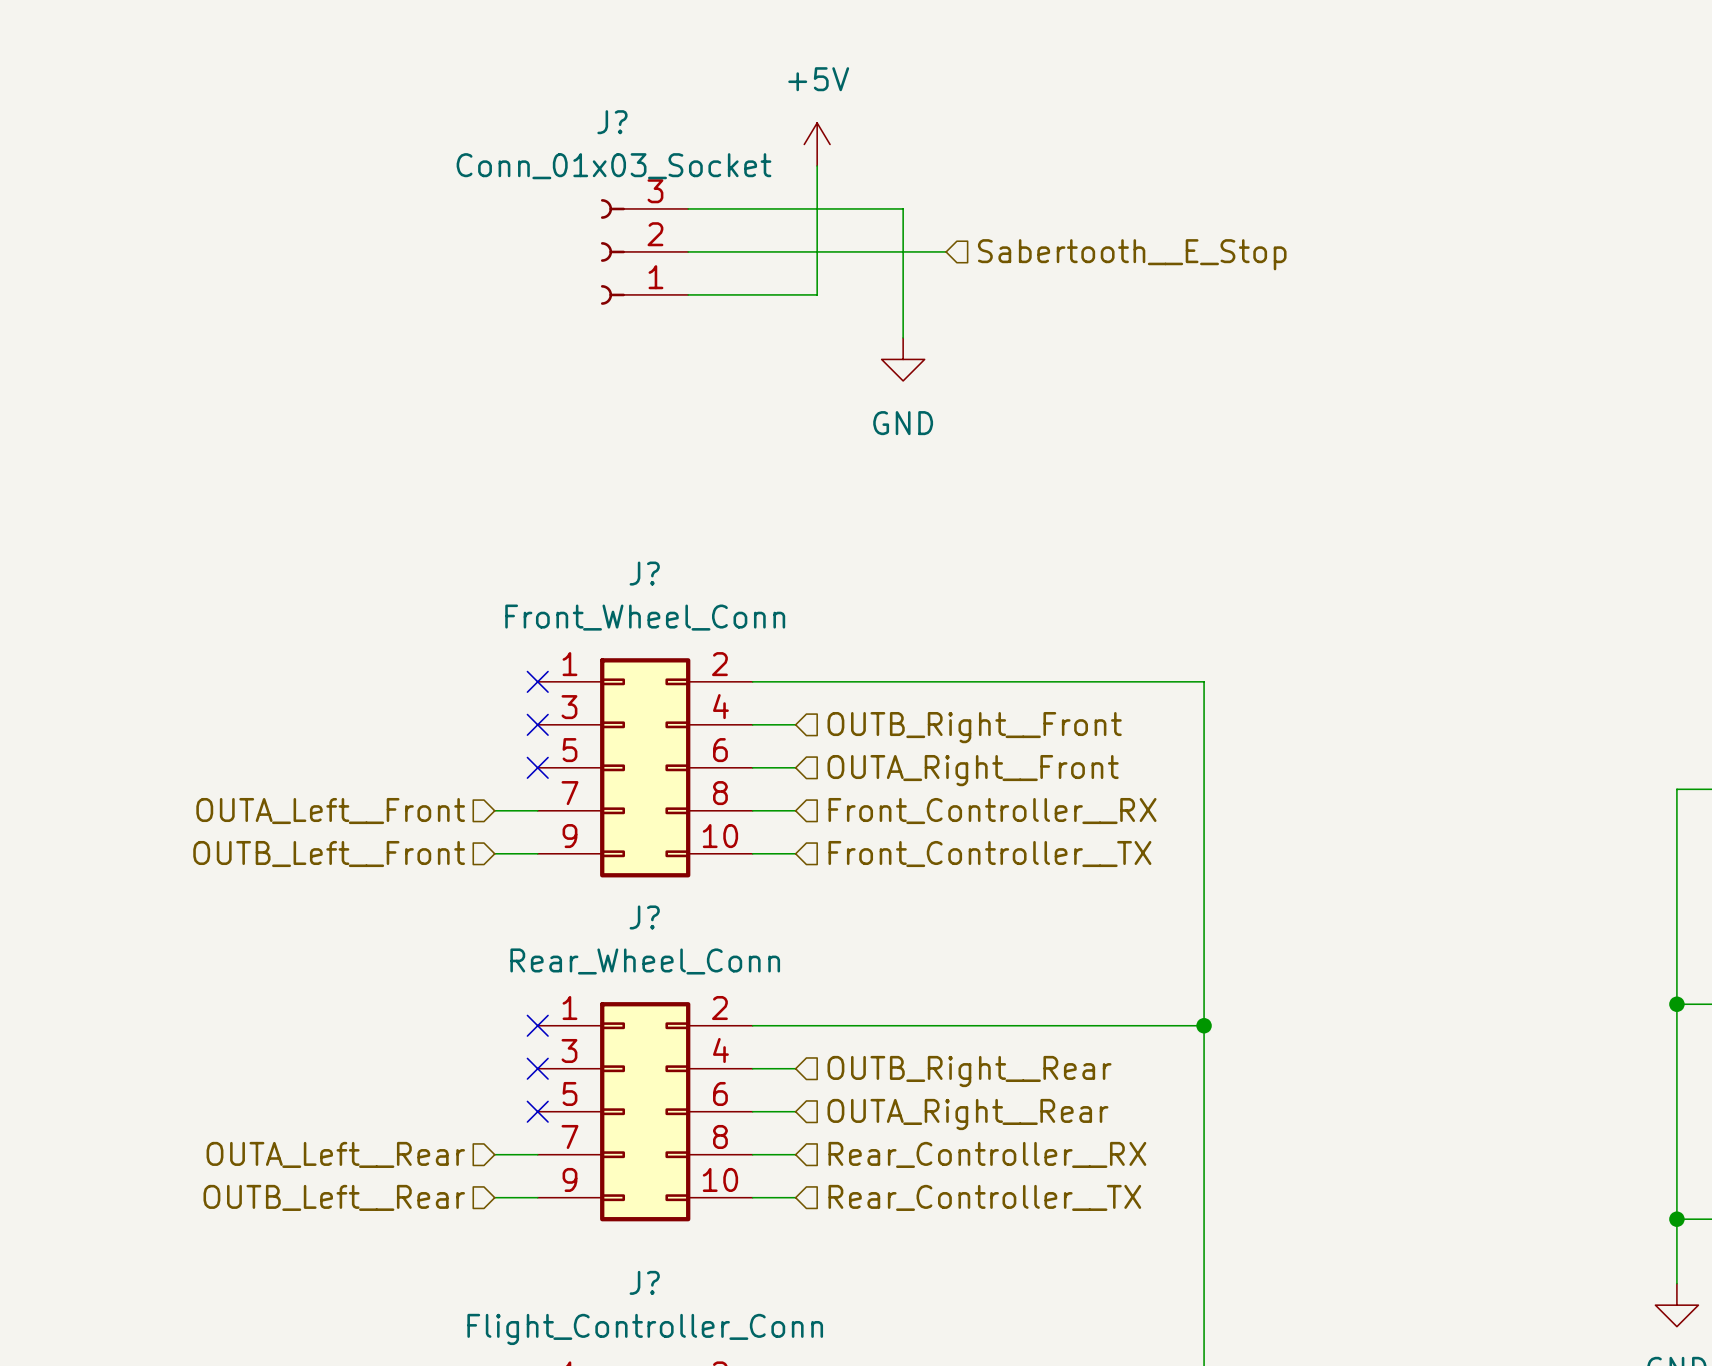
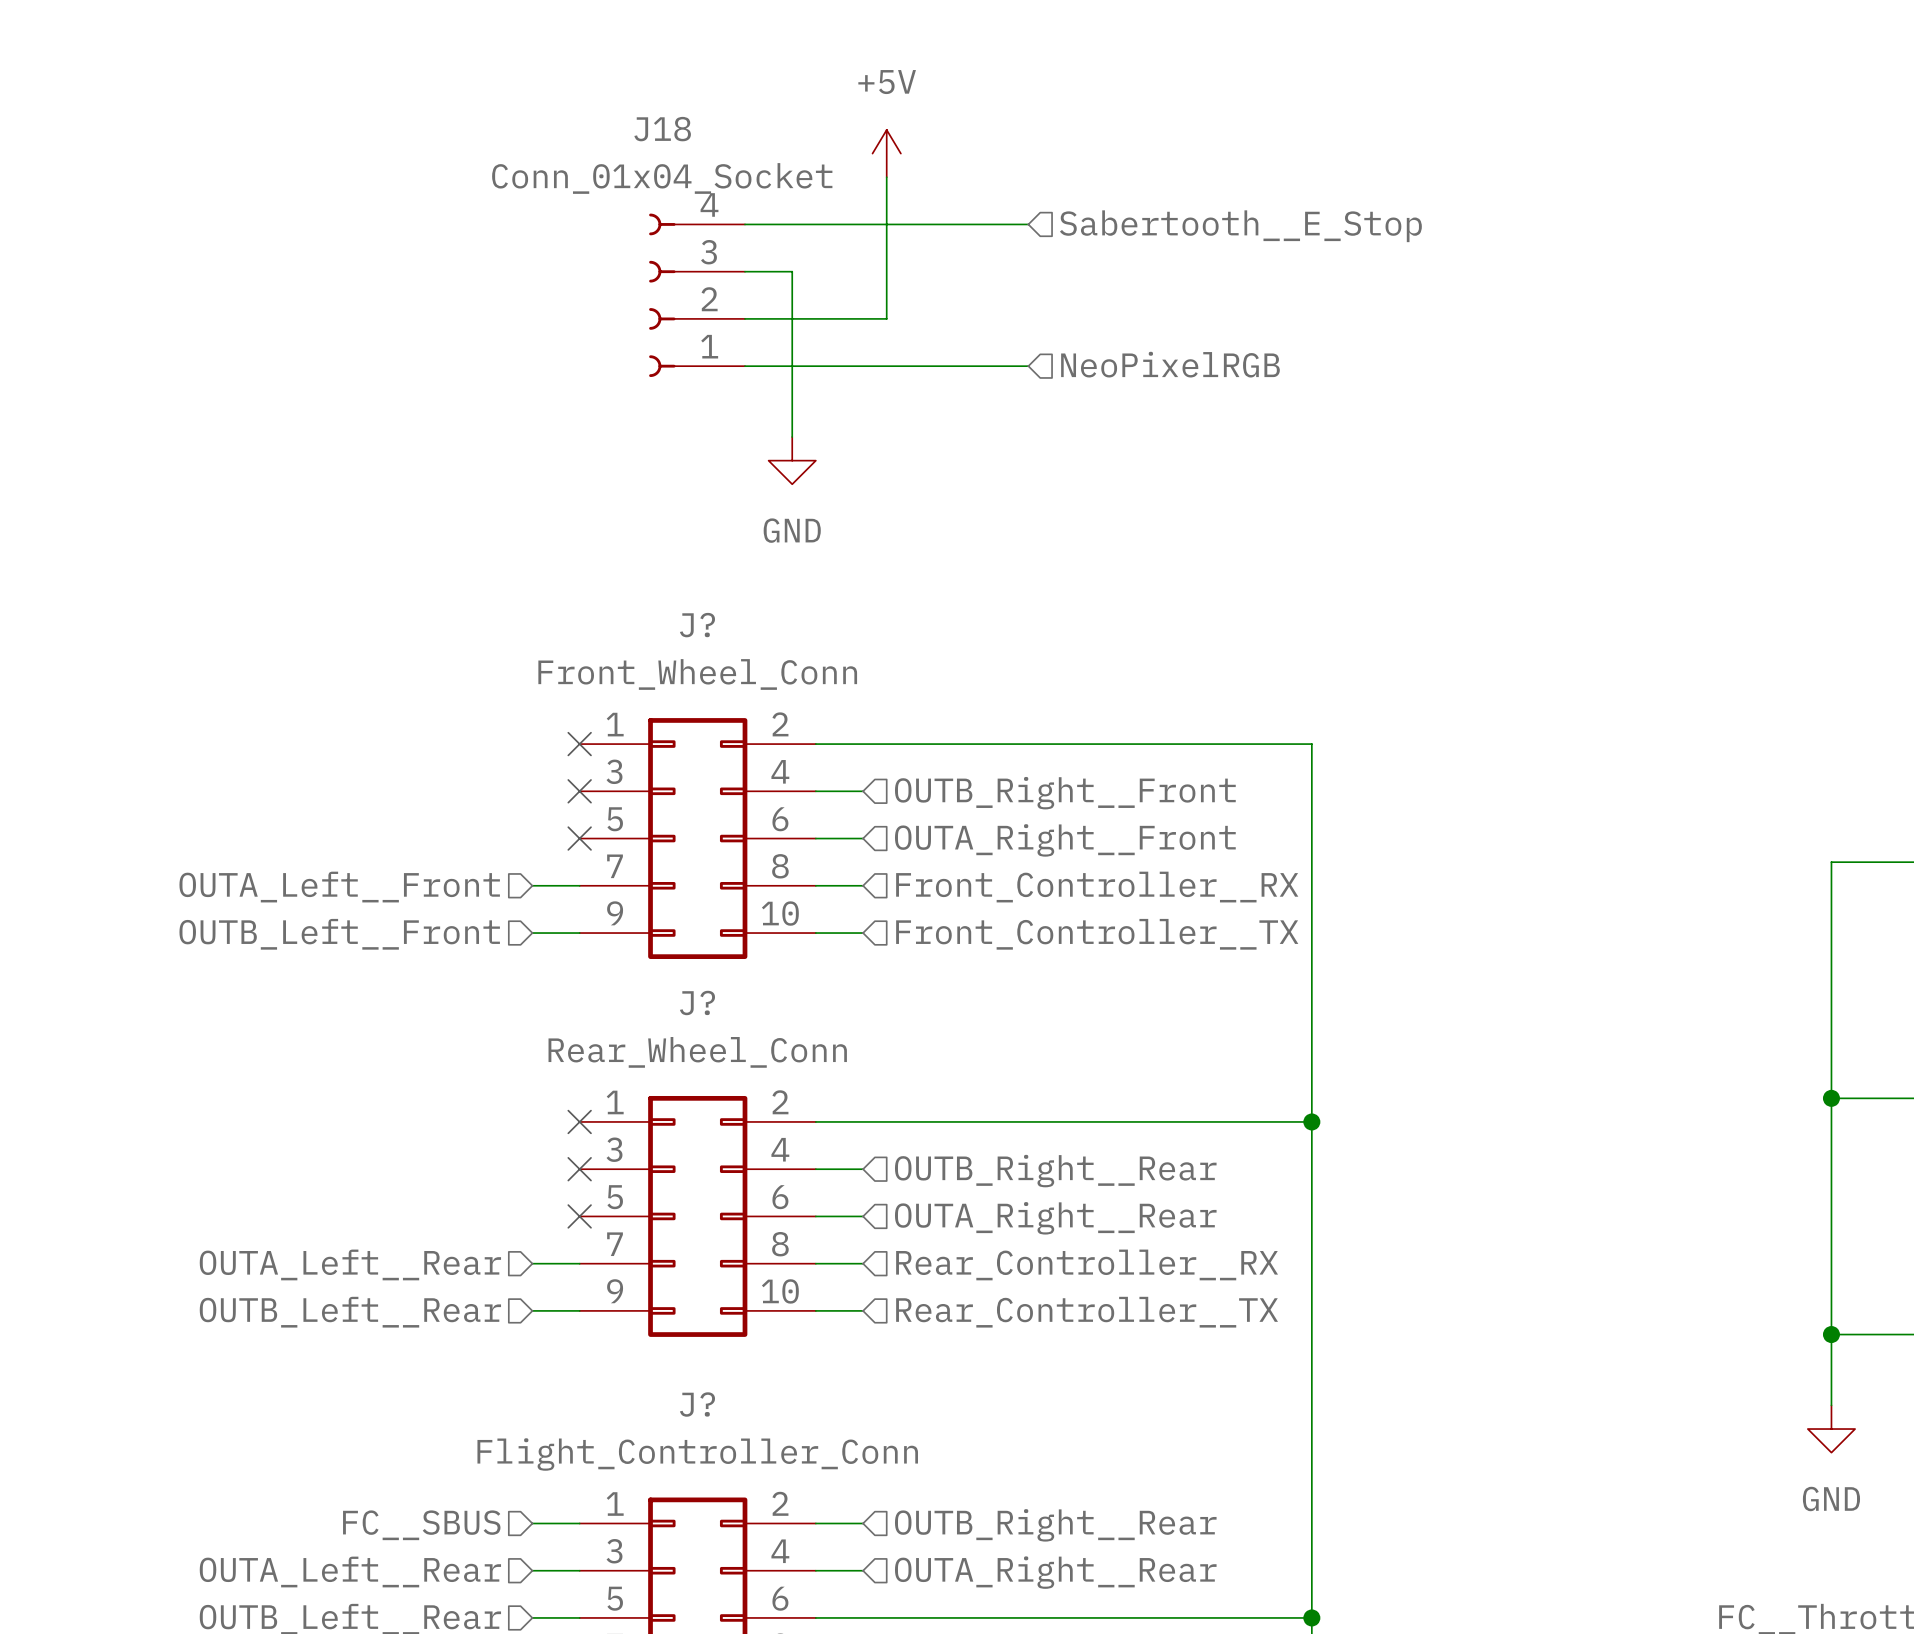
wire: (903, 208) (903, 337) -> (981, 224) (1028, 224)
J?: Conn_01x03_Socket (644, 251) -> none
wire: (731, 251) (946, 251) -> (792, 271) (792, 437)
hierarchical label position: Sabertooth__E_Stop (1132, 254) -> Sabertooth__E_Stop (1240, 226)
J18: none -> Conn_01x04_Socket (697, 295)
wire: none -> (744, 366) (1028, 366)
hierarchical label: none -> NeoPixelRGB (1170, 364)
power symbol position: GND (903, 359) -> GND (792, 460)

